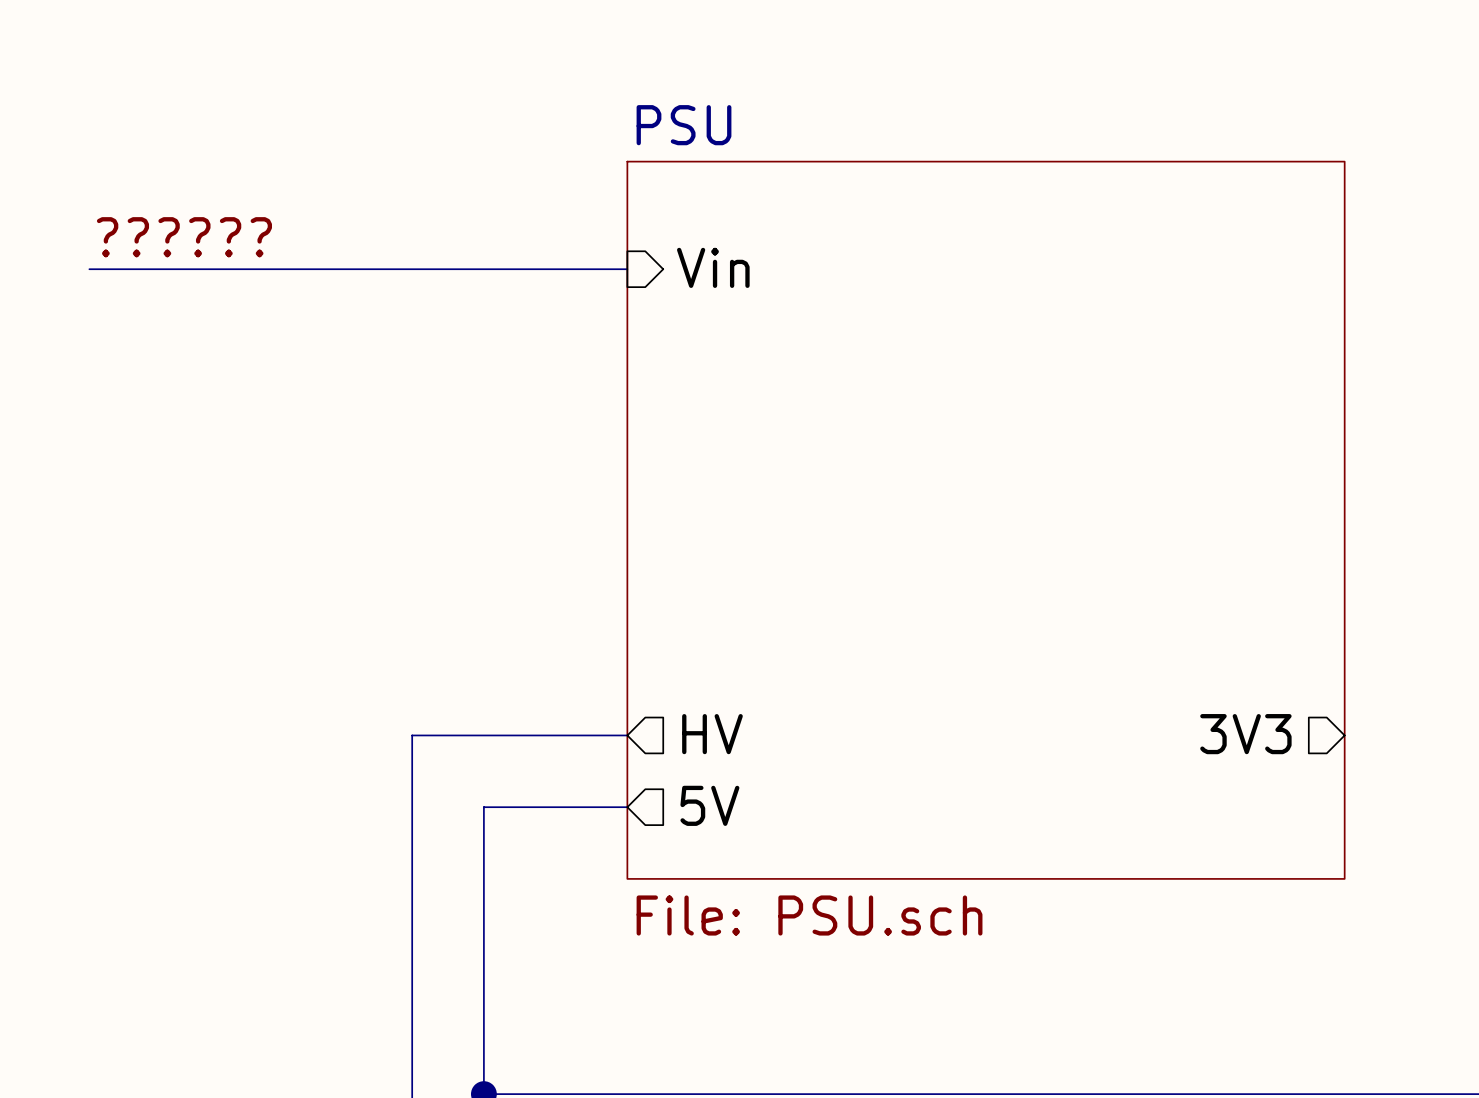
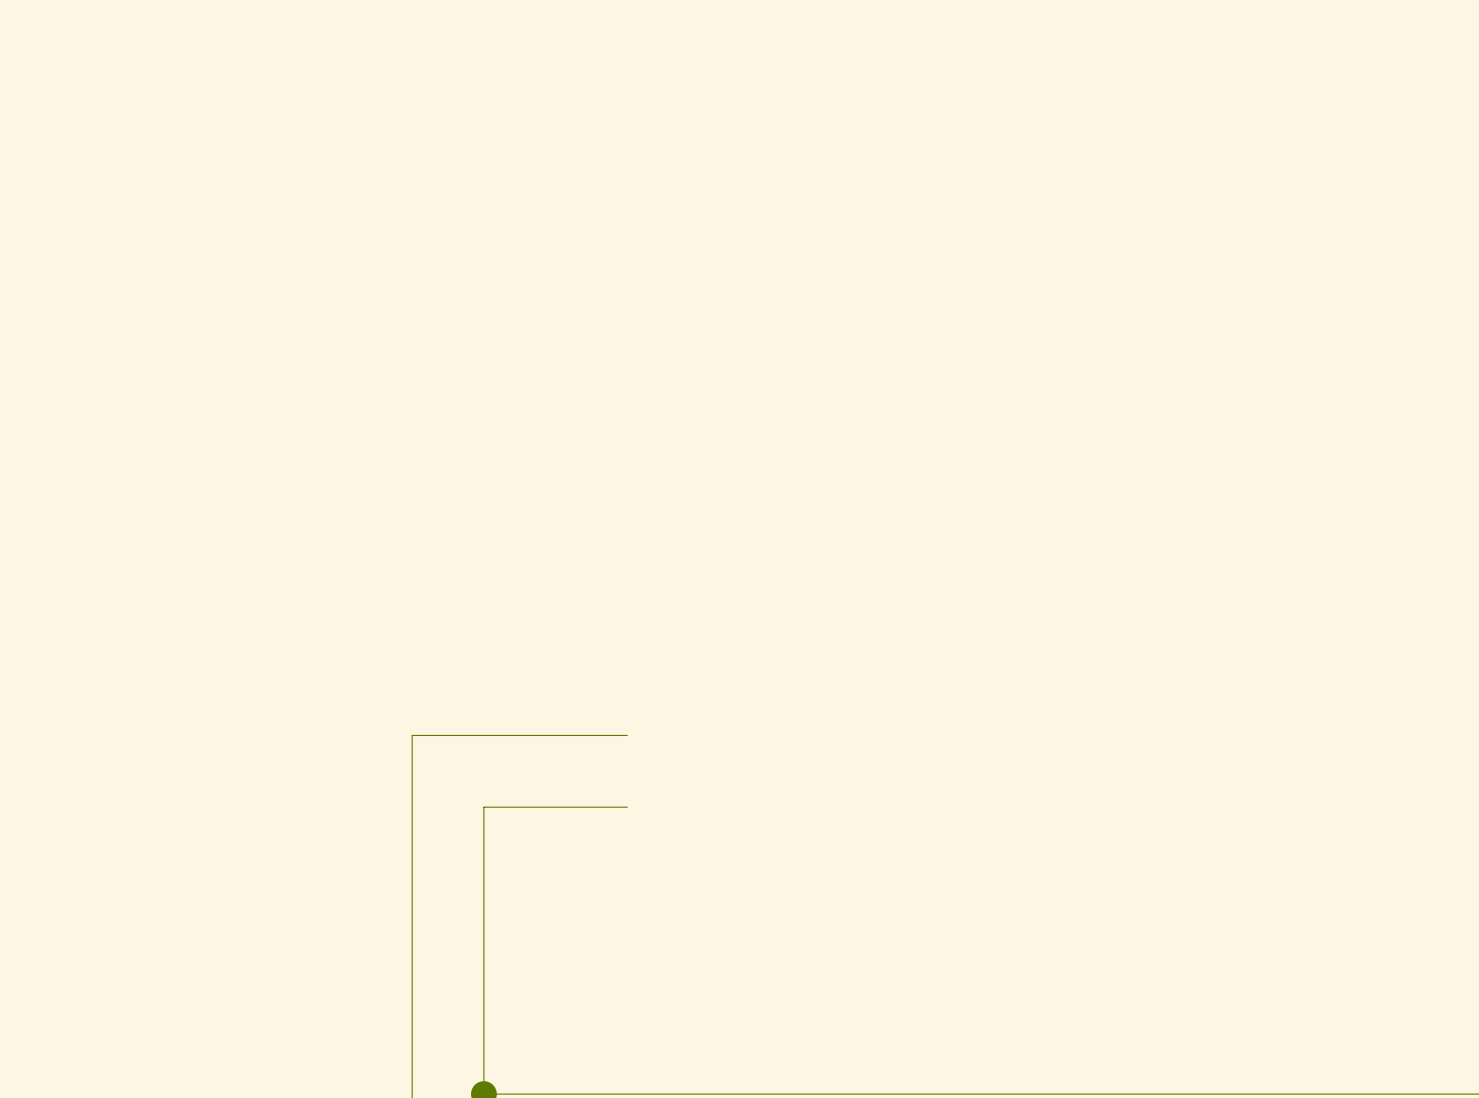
label: ?????? (184, 237) -> none
sheet pin: Vin (713, 267) -> none
wire: (89, 269) (627, 269) -> none
sheet PSU: File: PSU.sch (986, 520) -> none
sheet pin: HV (712, 734) -> none
sheet pin: 3V3 (1245, 734) -> none
sheet pin: 5V (709, 805) -> none

